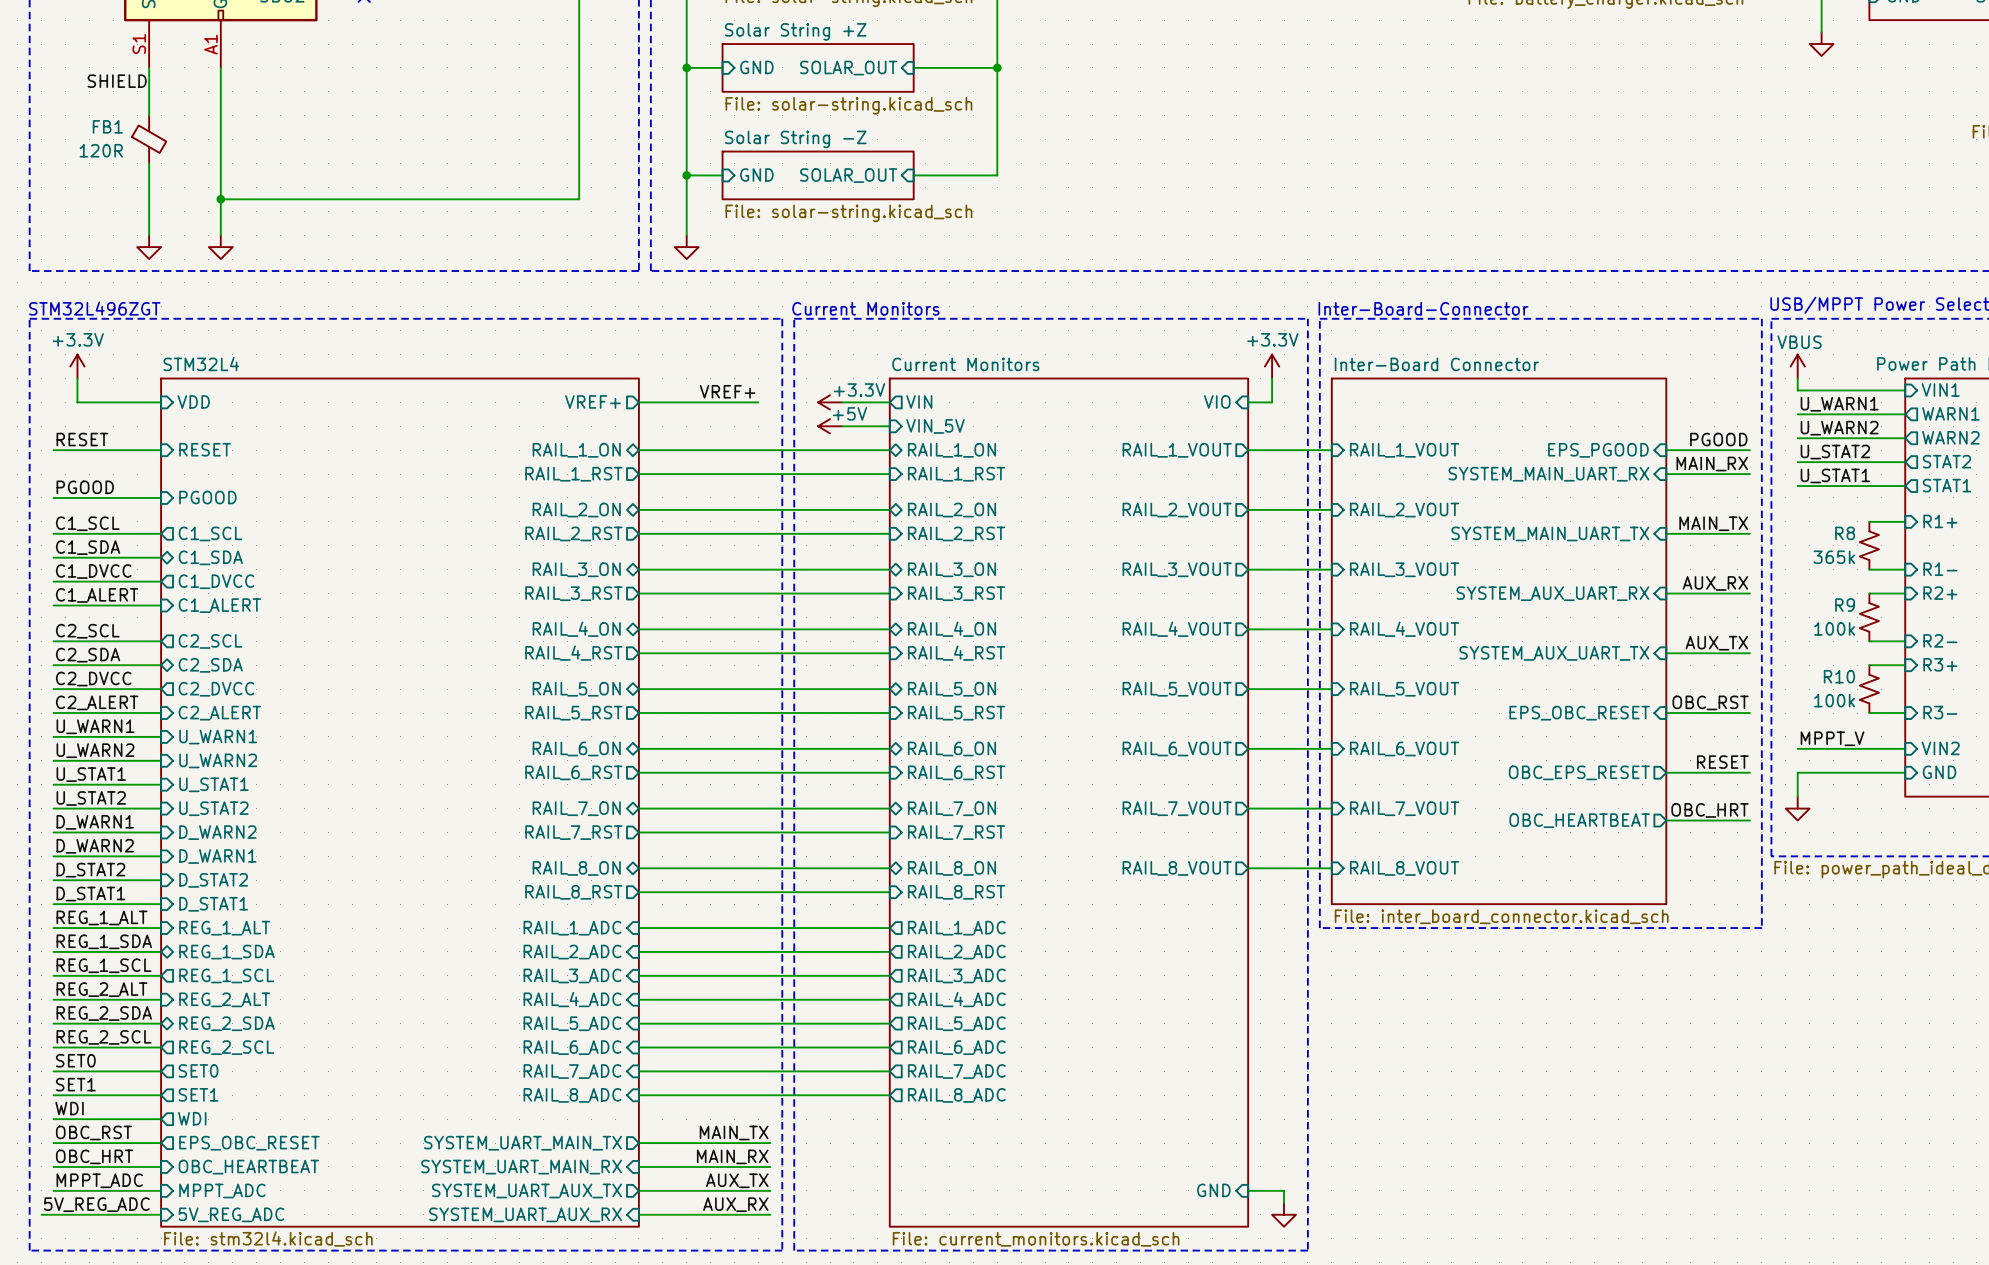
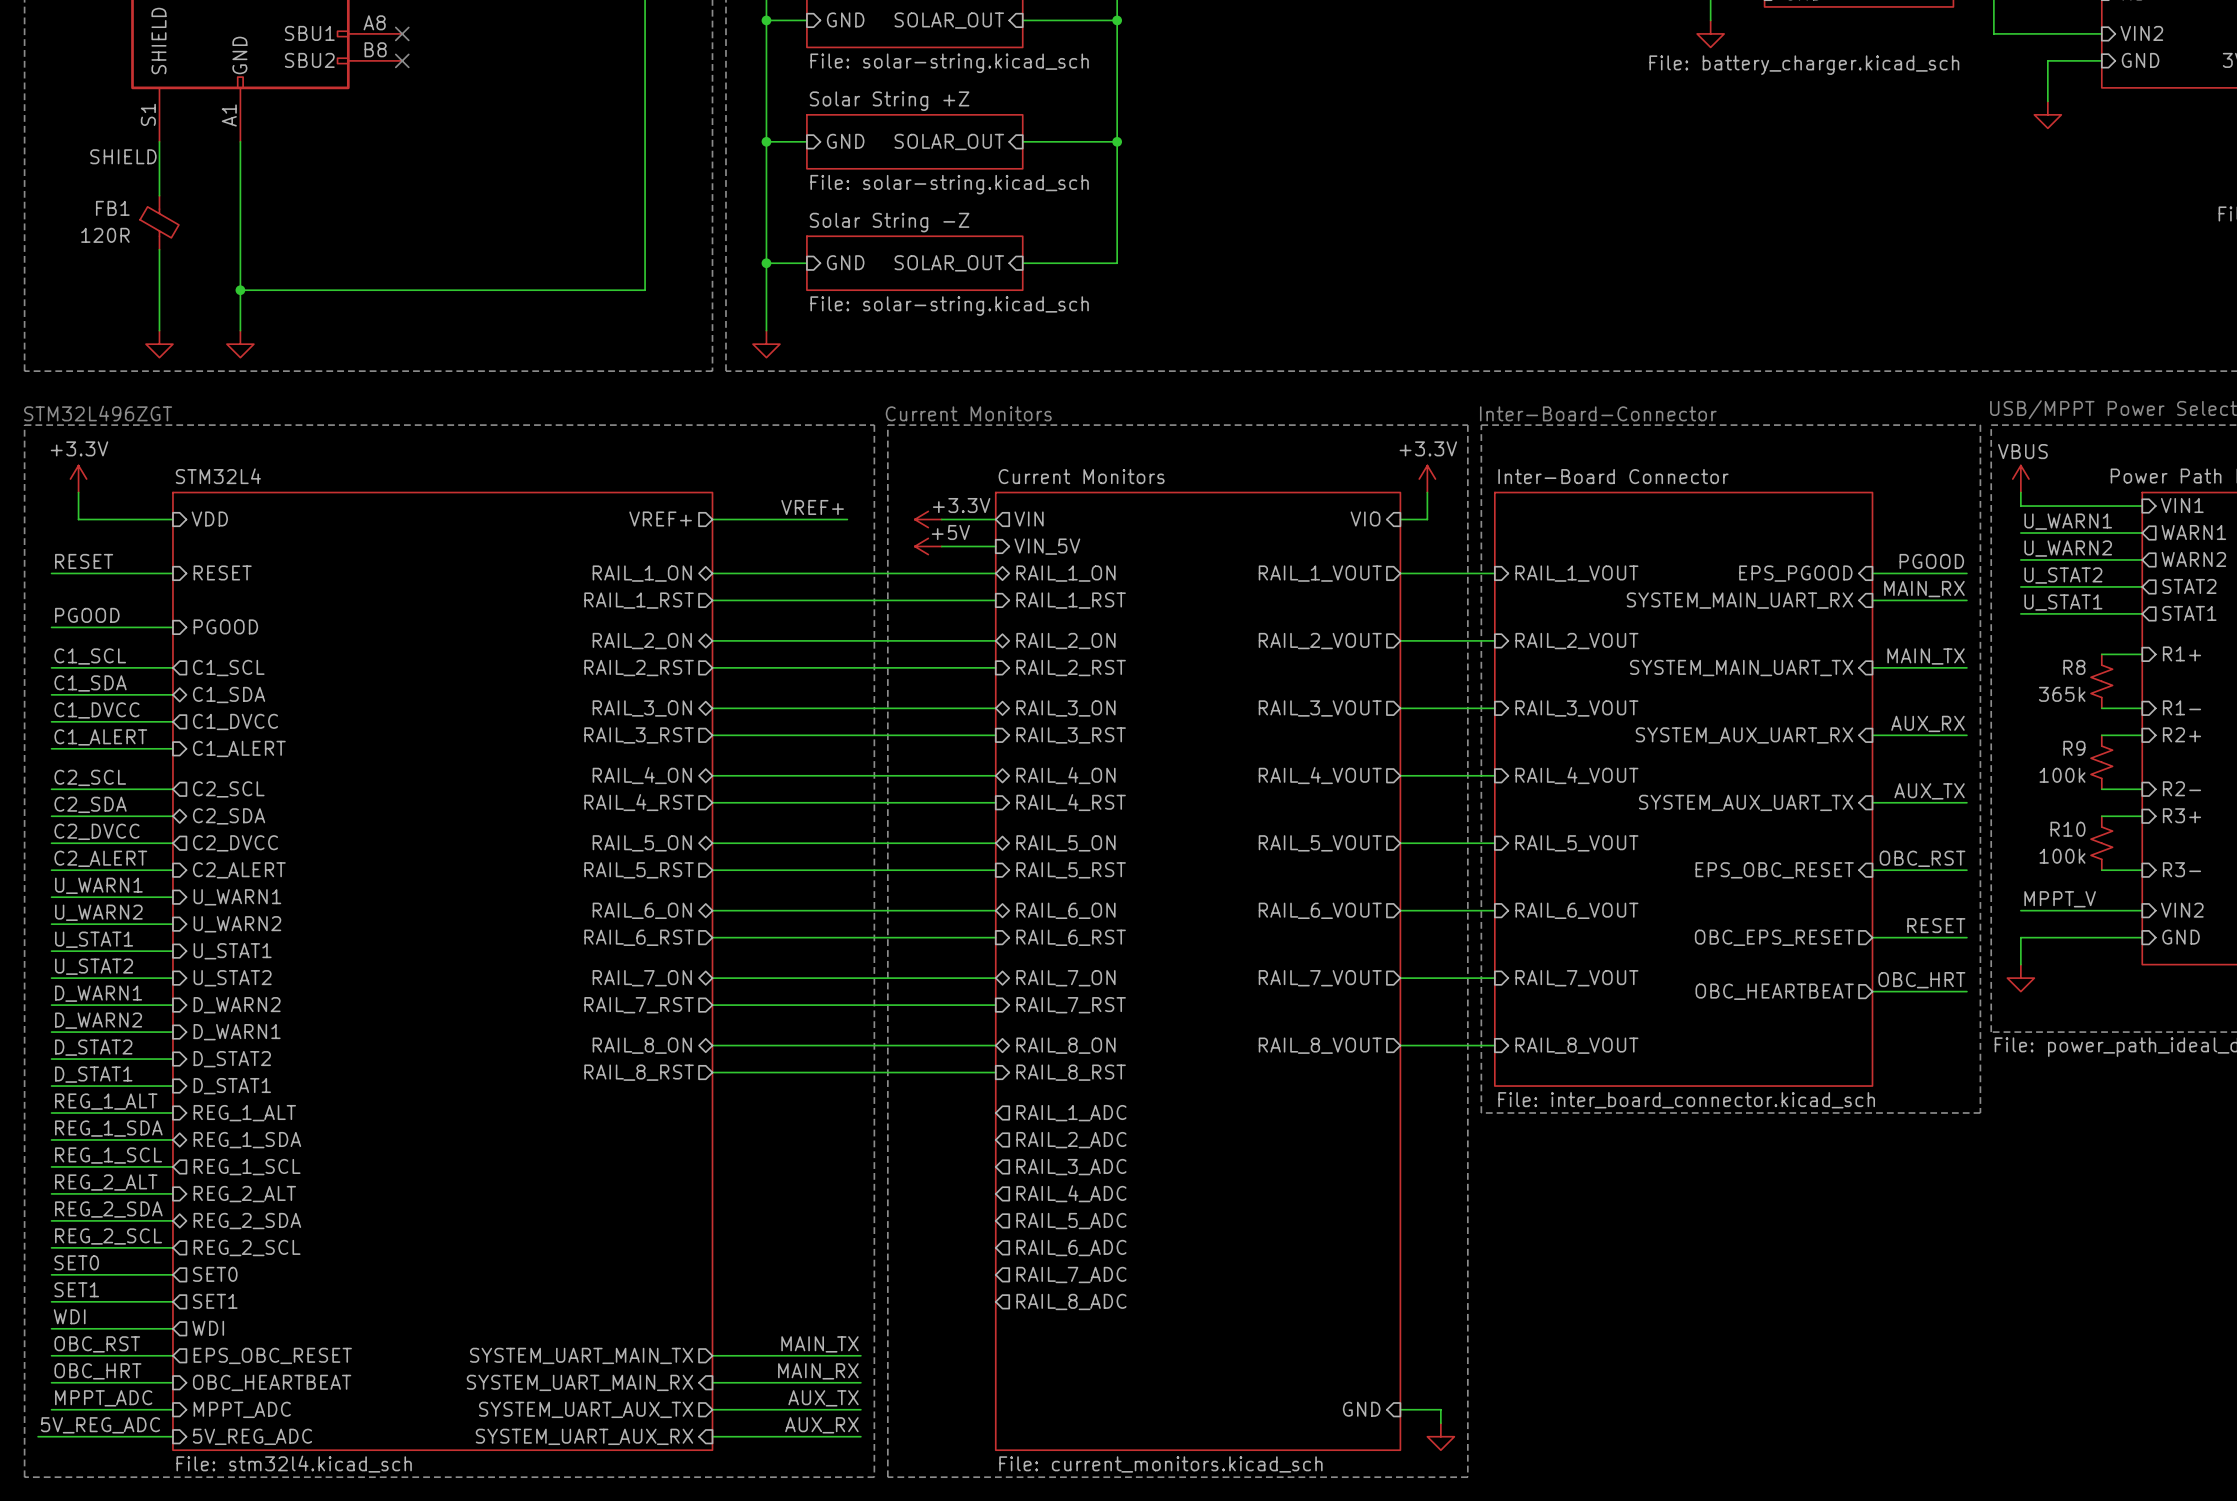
sheet pin: RAIL_1_ADC (572, 928) -> none
wire: (638, 928) (889, 928) -> none
wire: (638, 951) (889, 951) -> none
sheet pin: RAIL_2_ADC (572, 952) -> none
sheet pin: RAIL_3_ADC (572, 975) -> none
wire: (638, 975) (889, 975) -> none
sheet pin: RAIL_4_ADC (572, 999) -> none
wire: (638, 999) (889, 999) -> none
sheet pin: RAIL_5_ADC (572, 1023) -> none
wire: (638, 1023) (889, 1023) -> none
sheet pin: RAIL_6_ADC (572, 1047) -> none
wire: (638, 1047) (889, 1047) -> none
sheet pin: RAIL_7_ADC (572, 1071) -> none
wire: (638, 1071) (889, 1071) -> none
sheet pin: RAIL_8_ADC (572, 1095) -> none
wire: (638, 1095) (889, 1095) -> none

